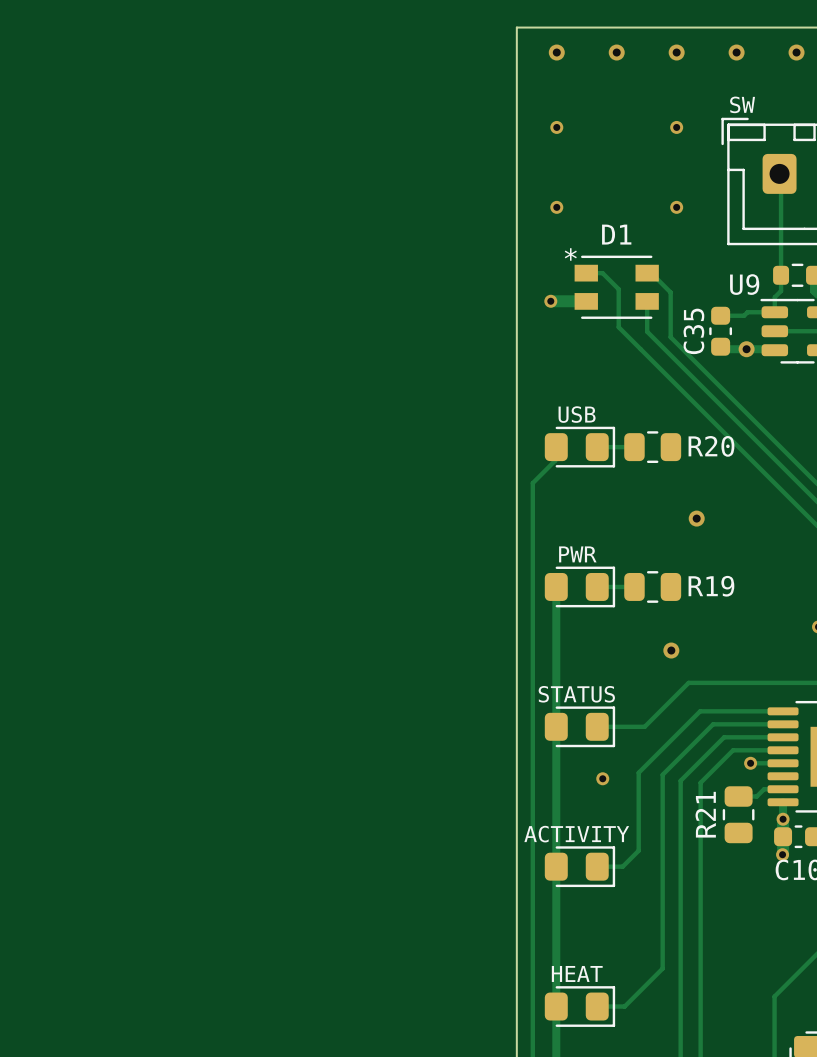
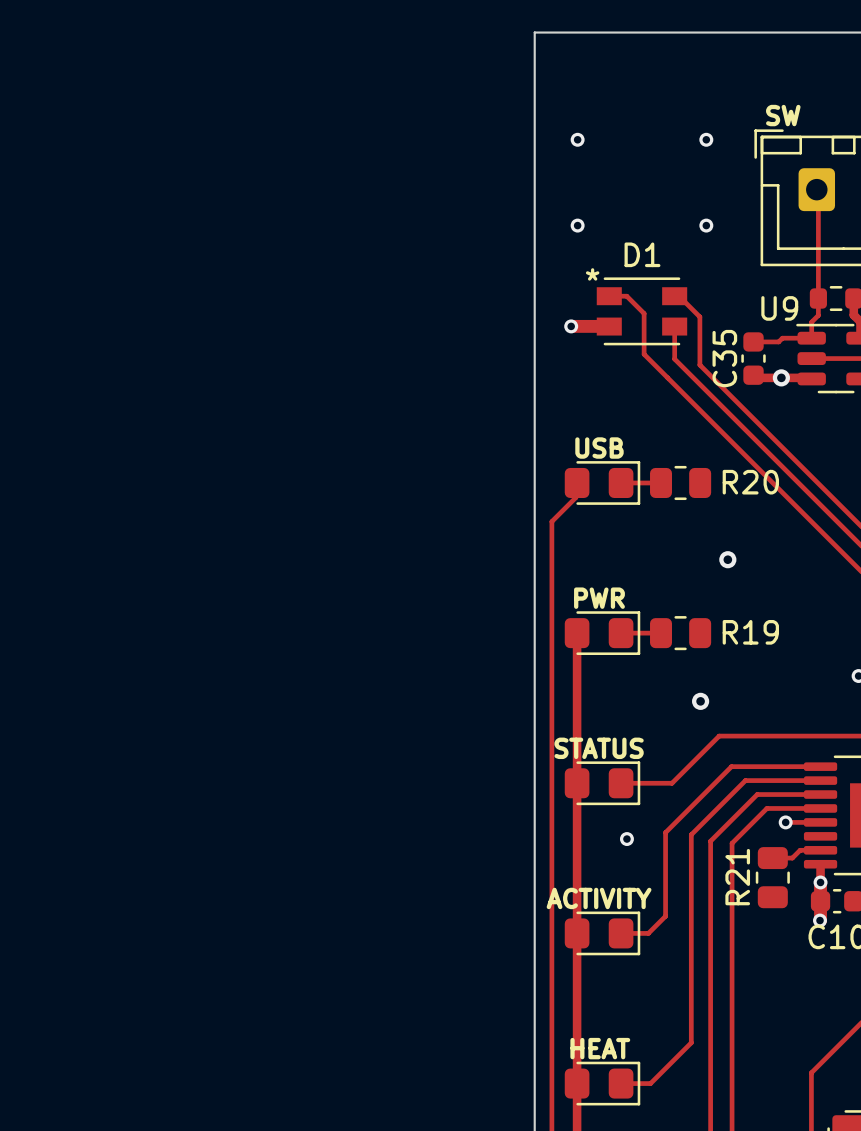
via: (556, 52) -> none
via: (616, 52) -> none
via: (676, 52) -> none
via: (736, 52) -> none
via: (796, 52) -> none

